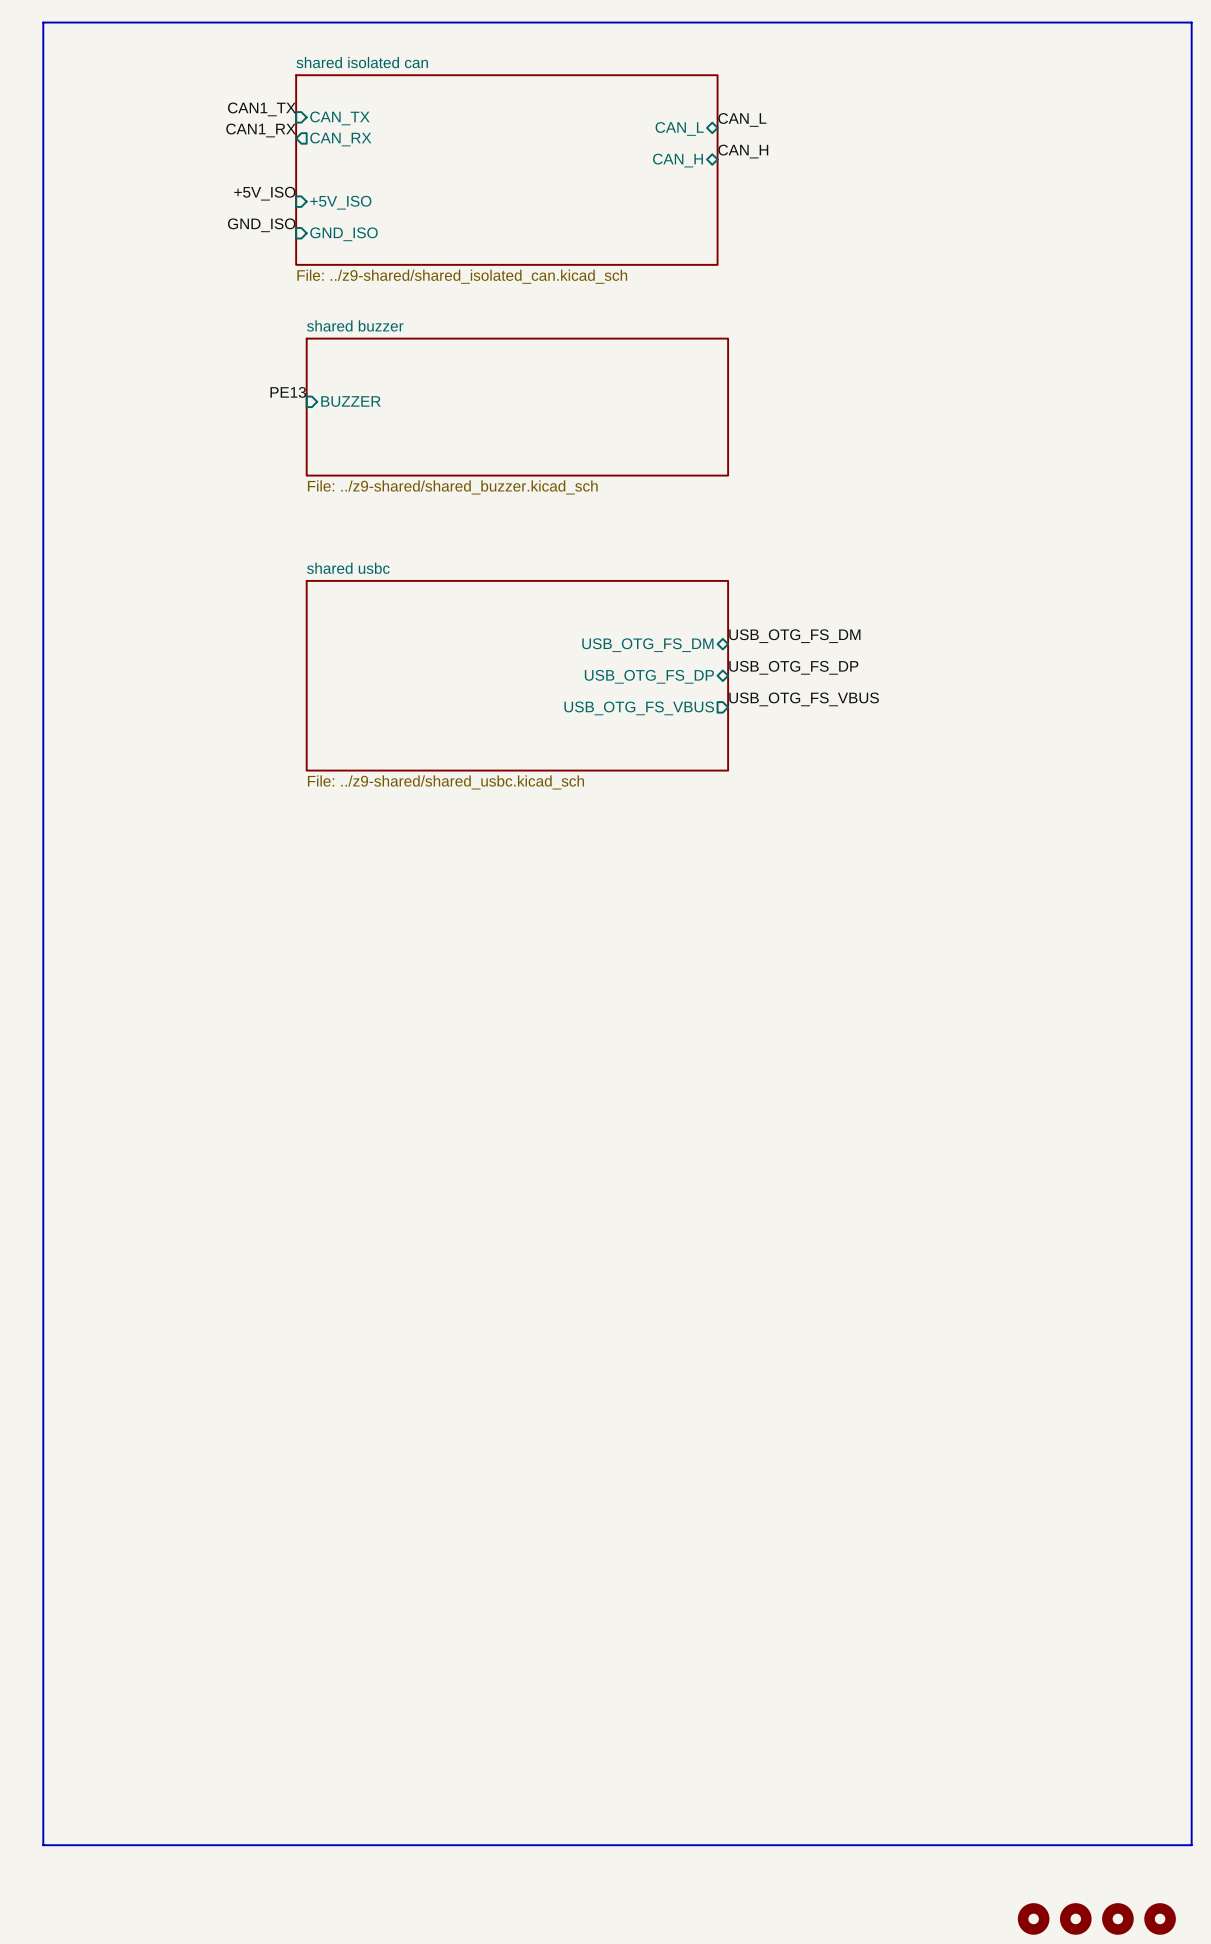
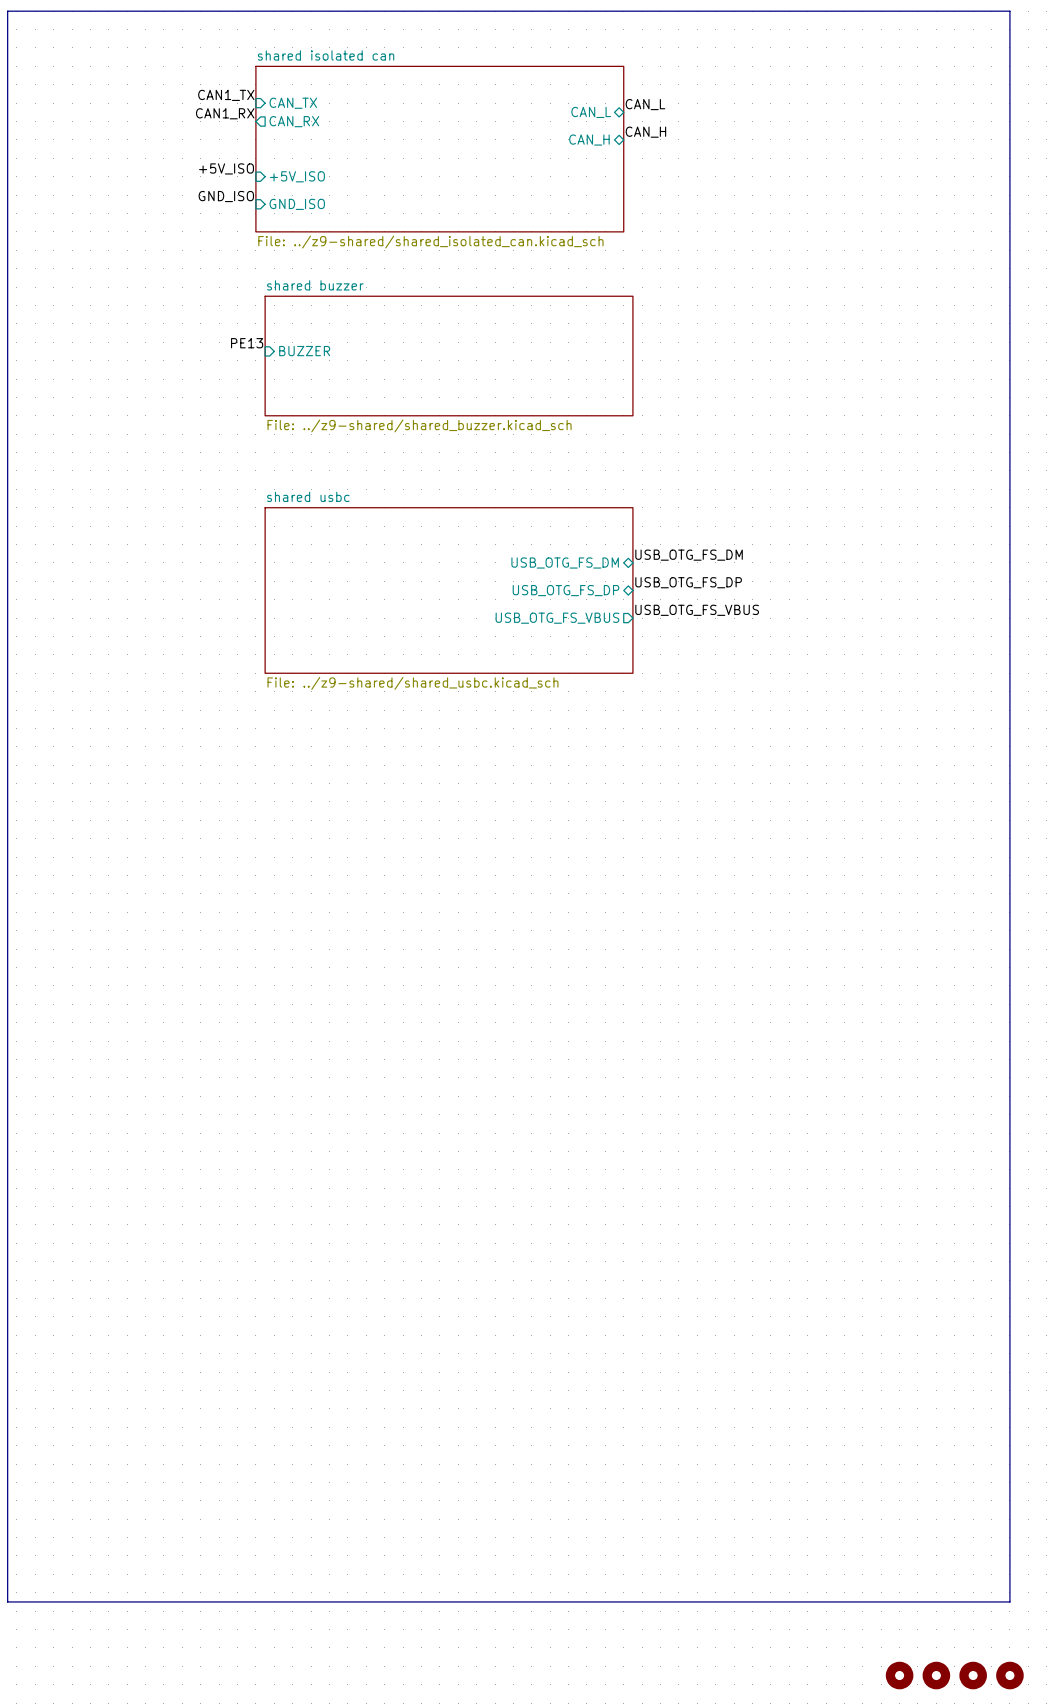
line: (43, 22) (1191, 22) (1191, 1845) (43, 1845) (43, 22) -> (7, 11) (1009, 11) (1009, 1601) (7, 1601) (7, 11)

